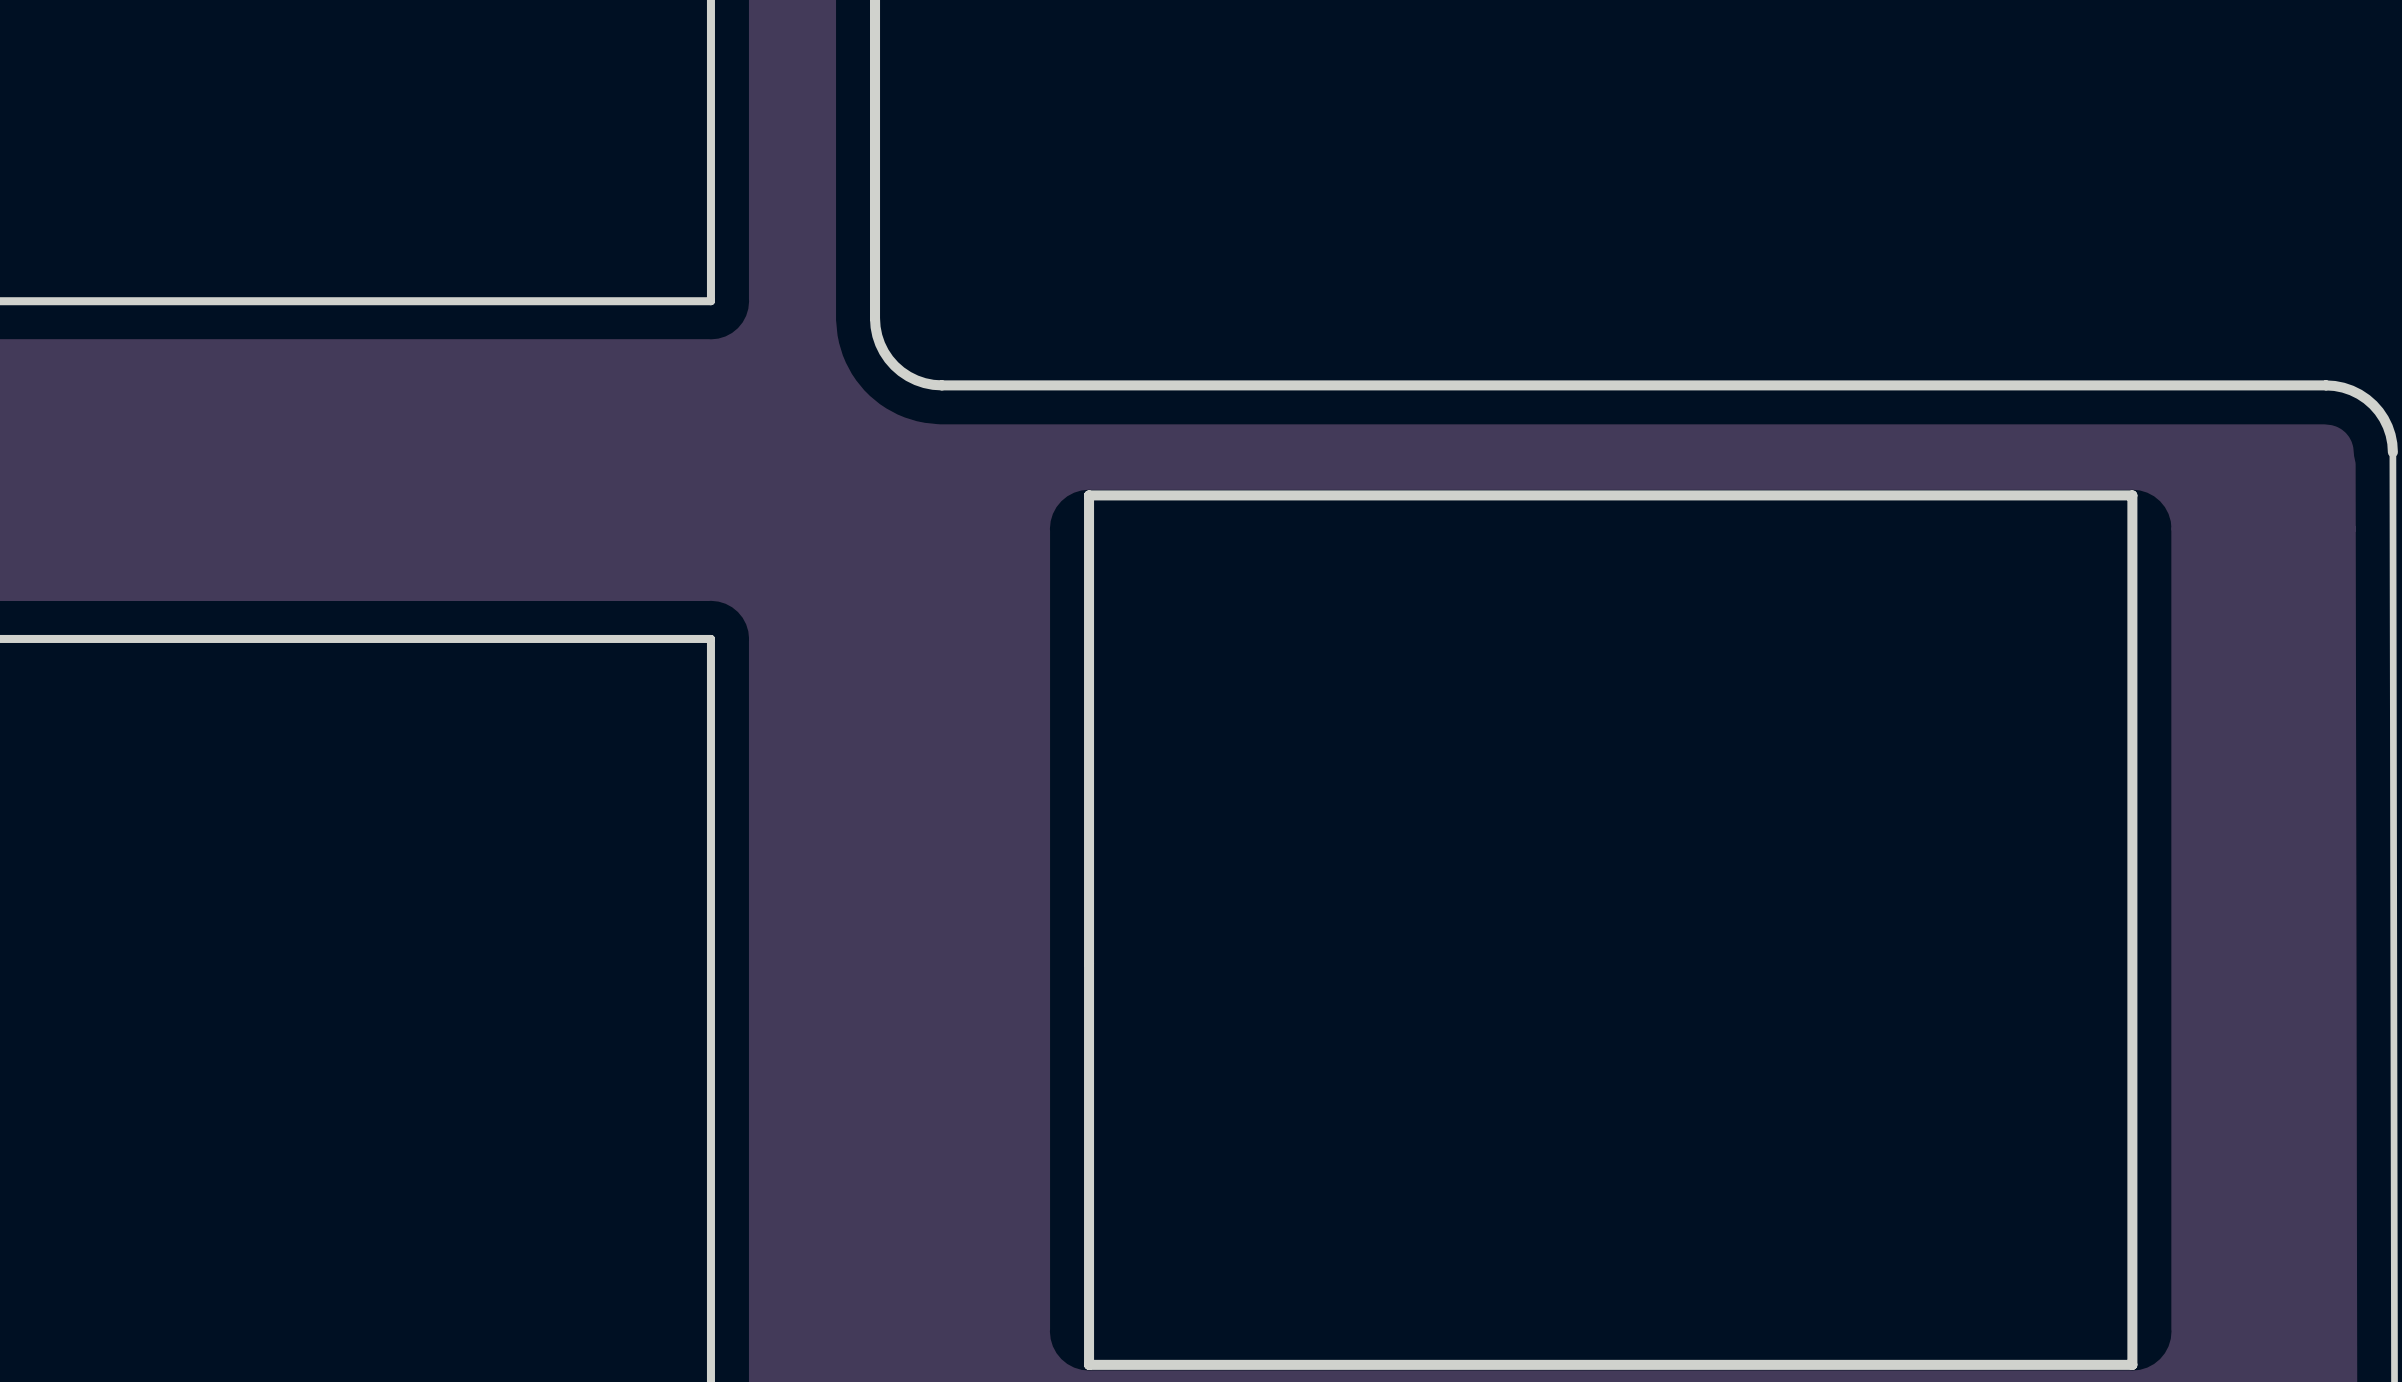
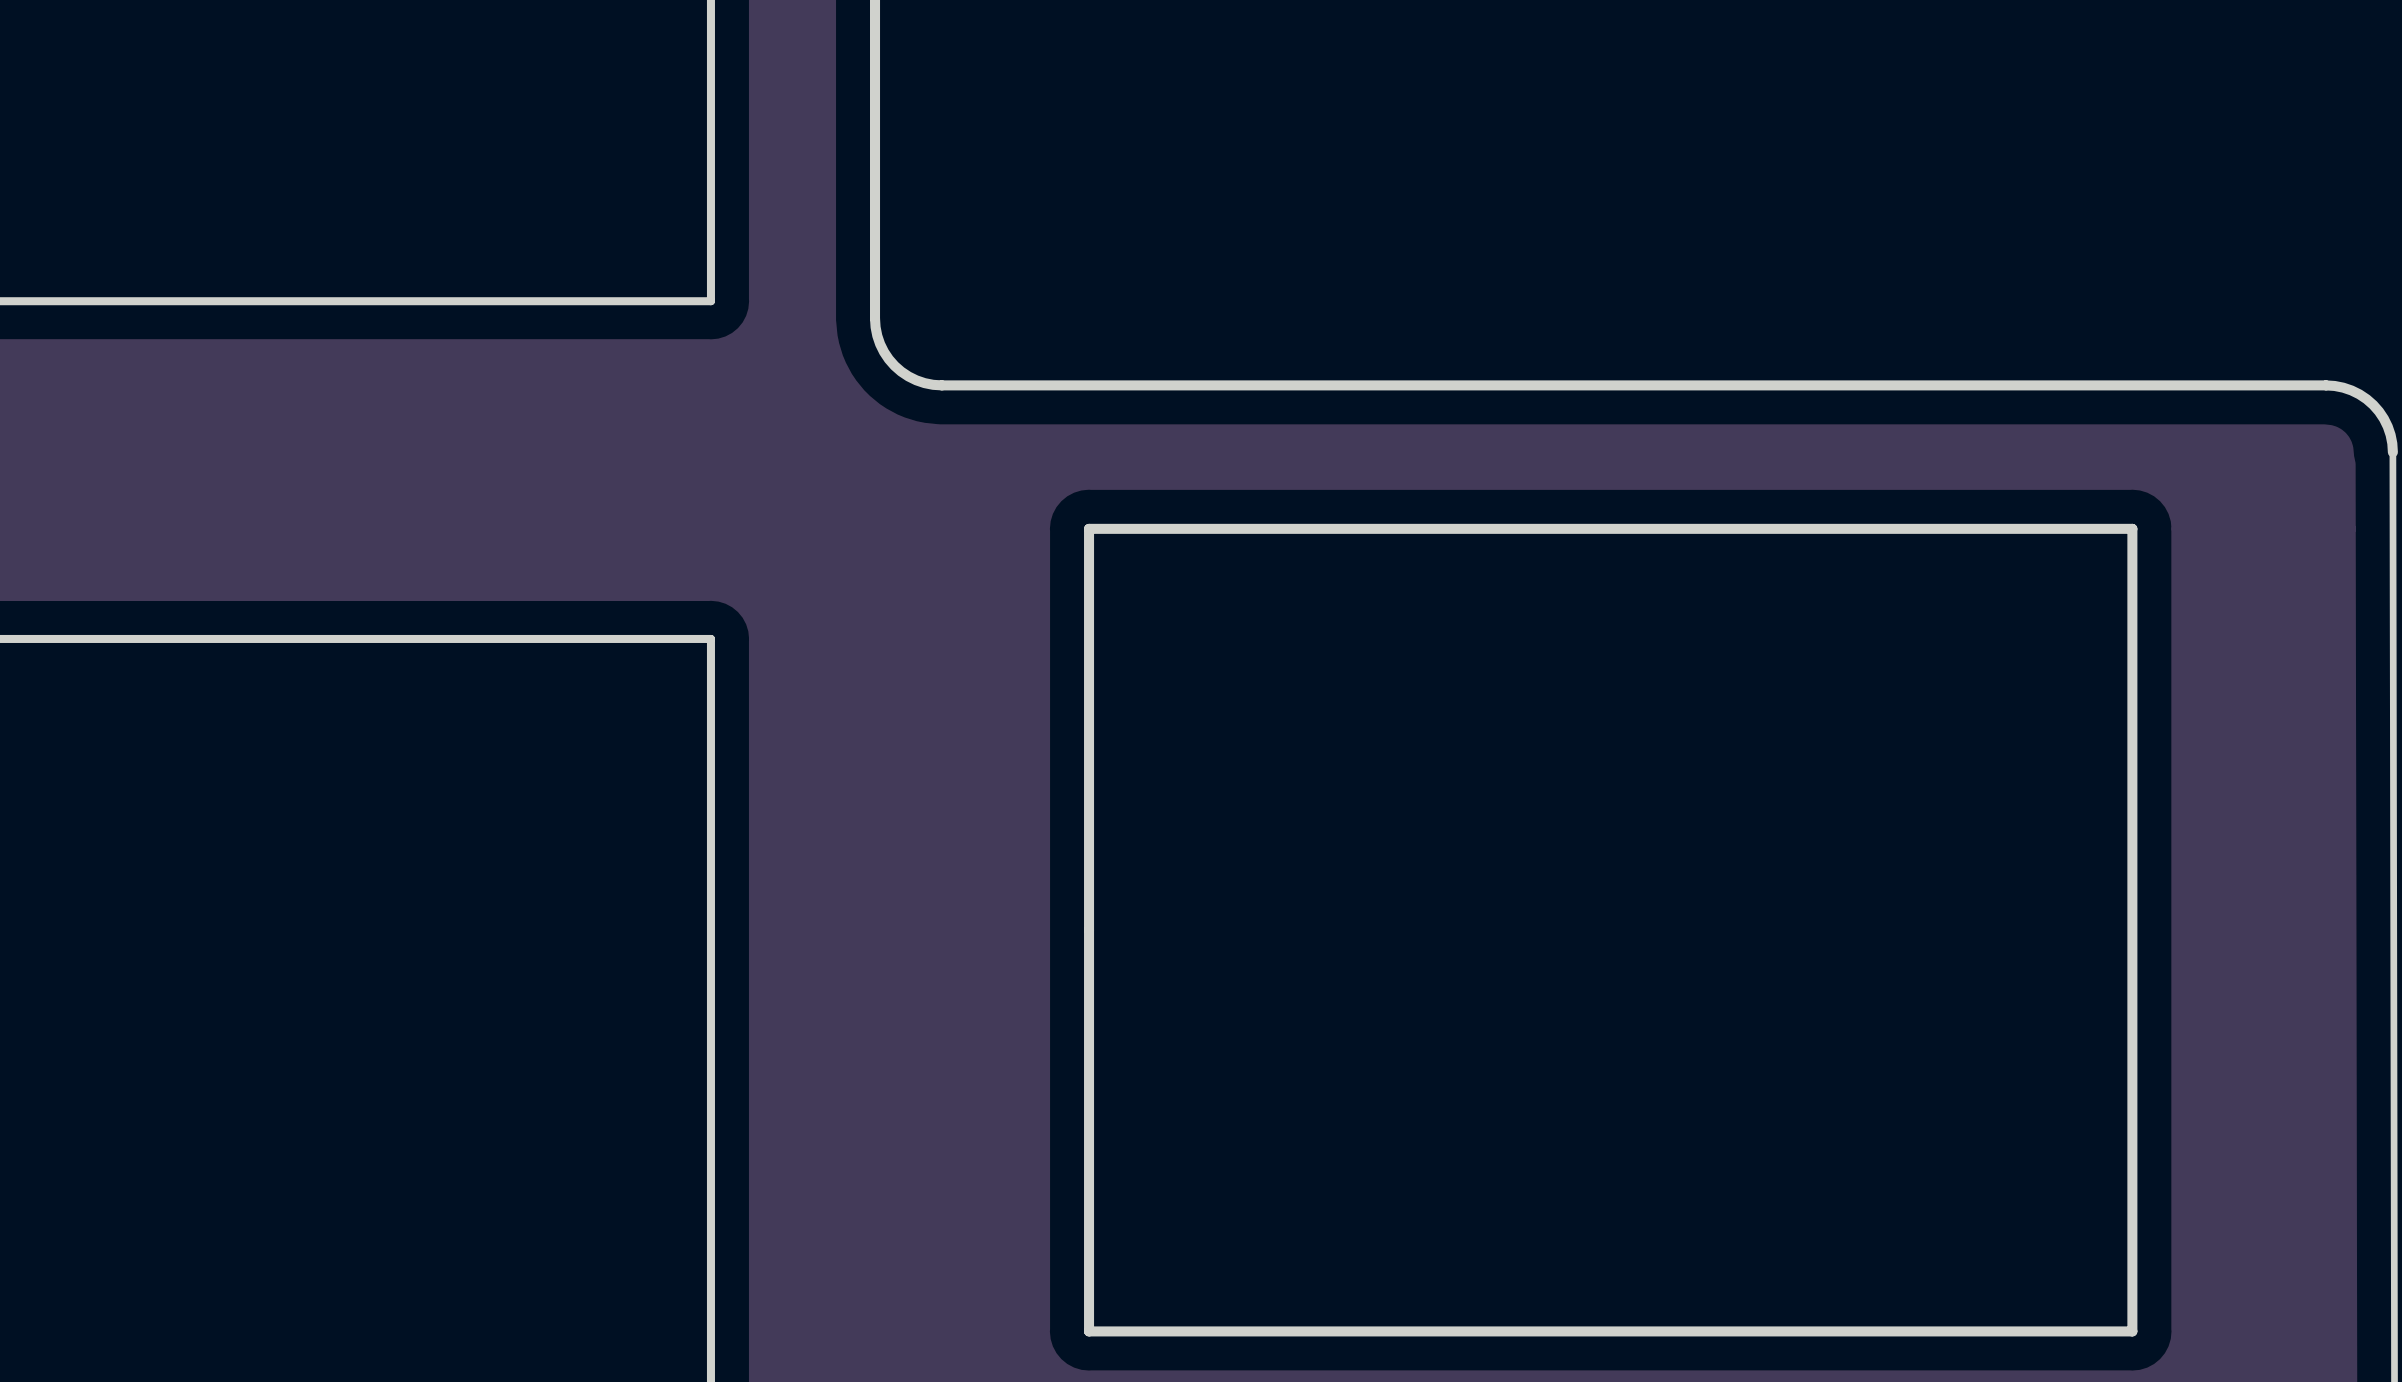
board edge: (2132, 528) (2132, 495) (1089, 495) (1089, 528) -> (2132, 528) (1089, 528)
board edge: (2132, 1331) (2132, 1364) (1089, 1364) (1089, 1331) -> (2132, 1331) (1089, 1331)

